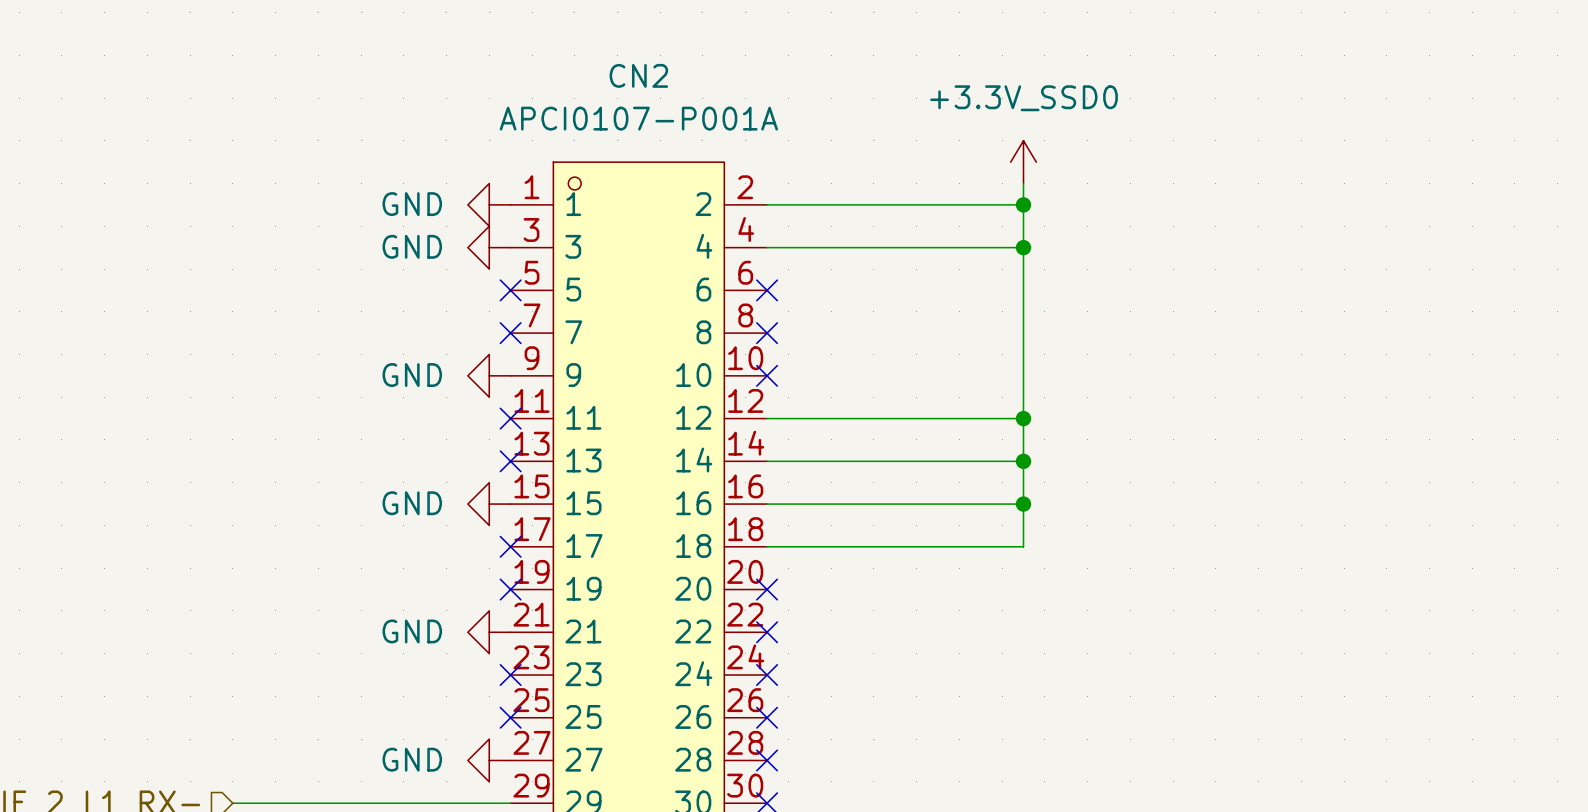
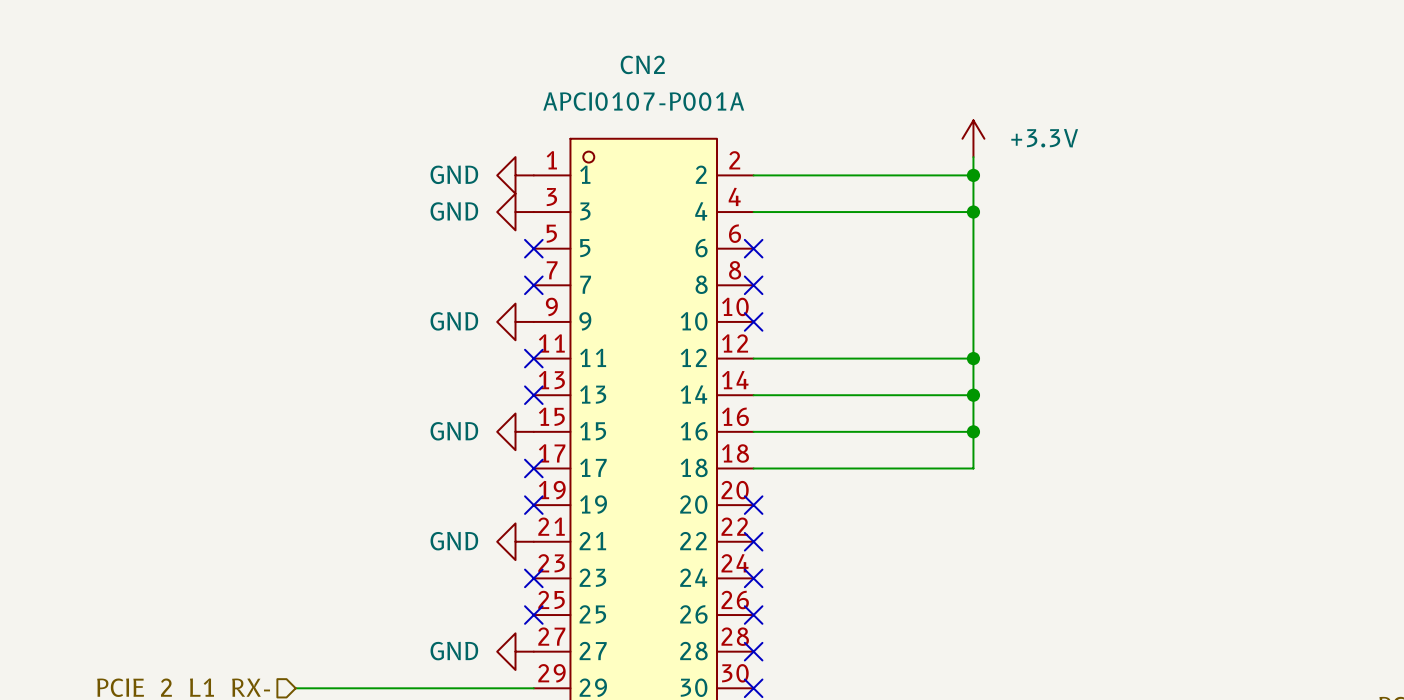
power symbol: +3.3V_SSD0 (1023, 162) -> +3.3V (973, 138)

